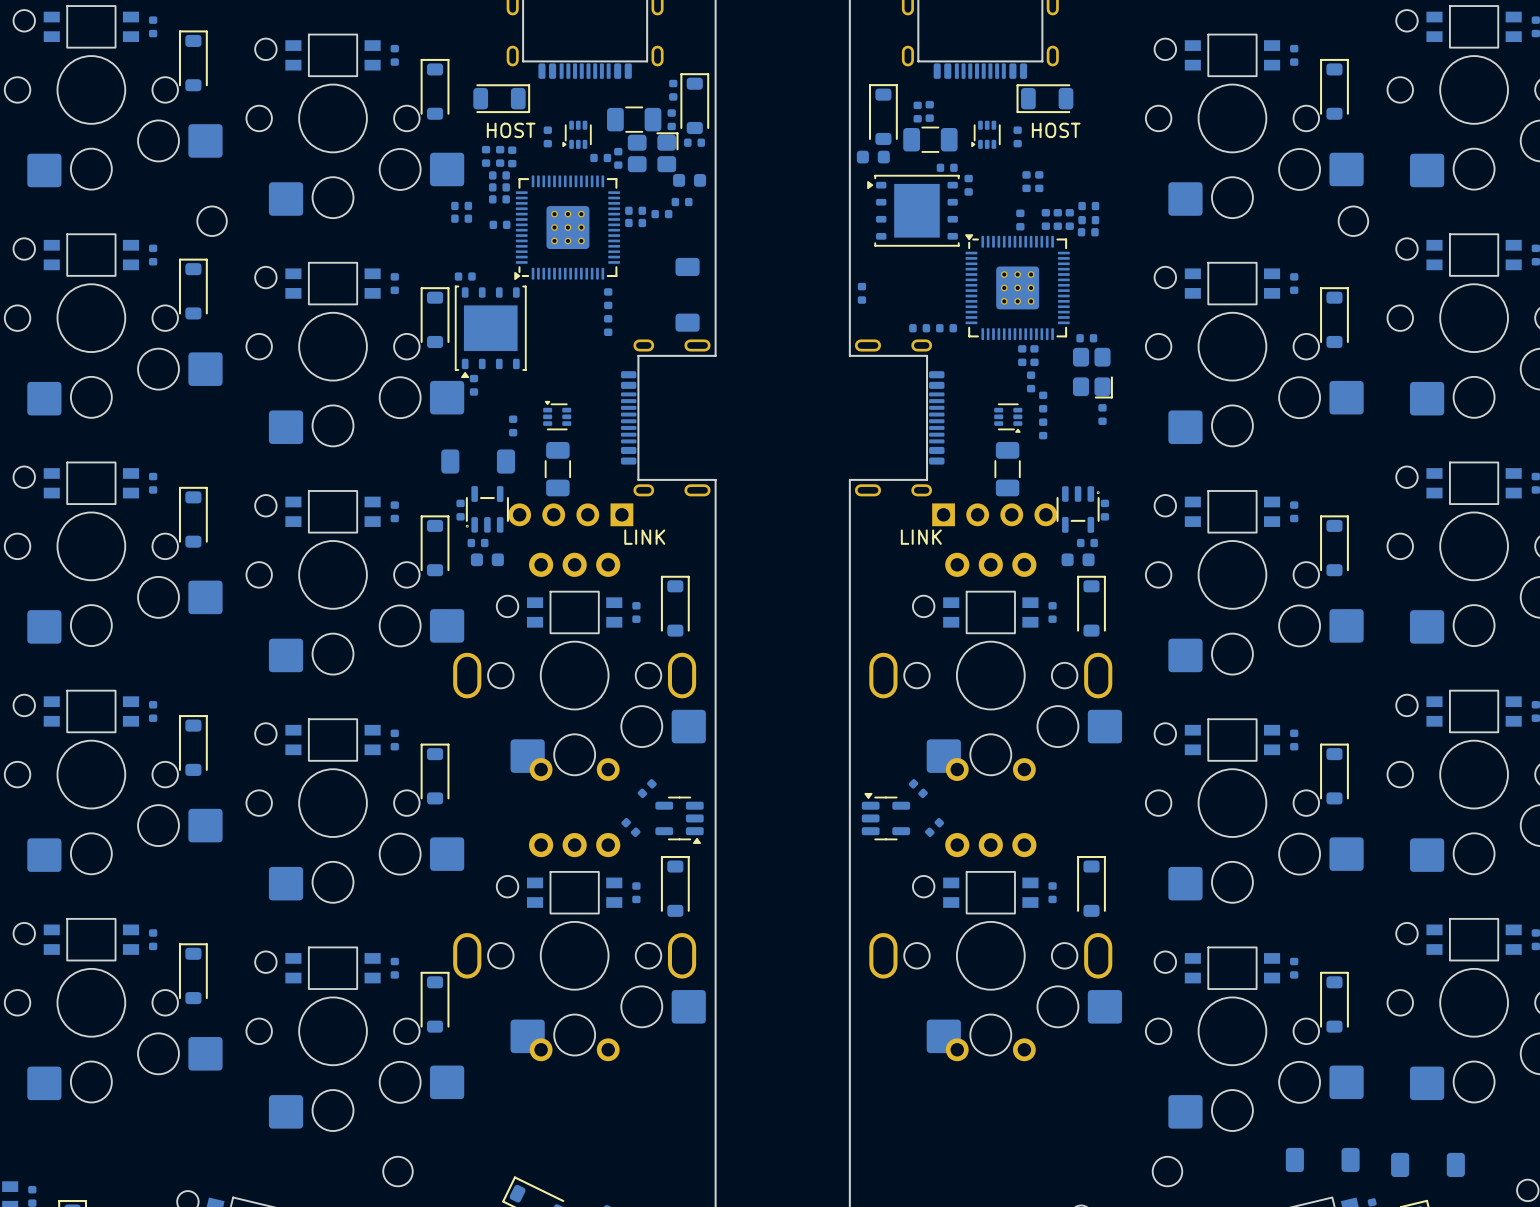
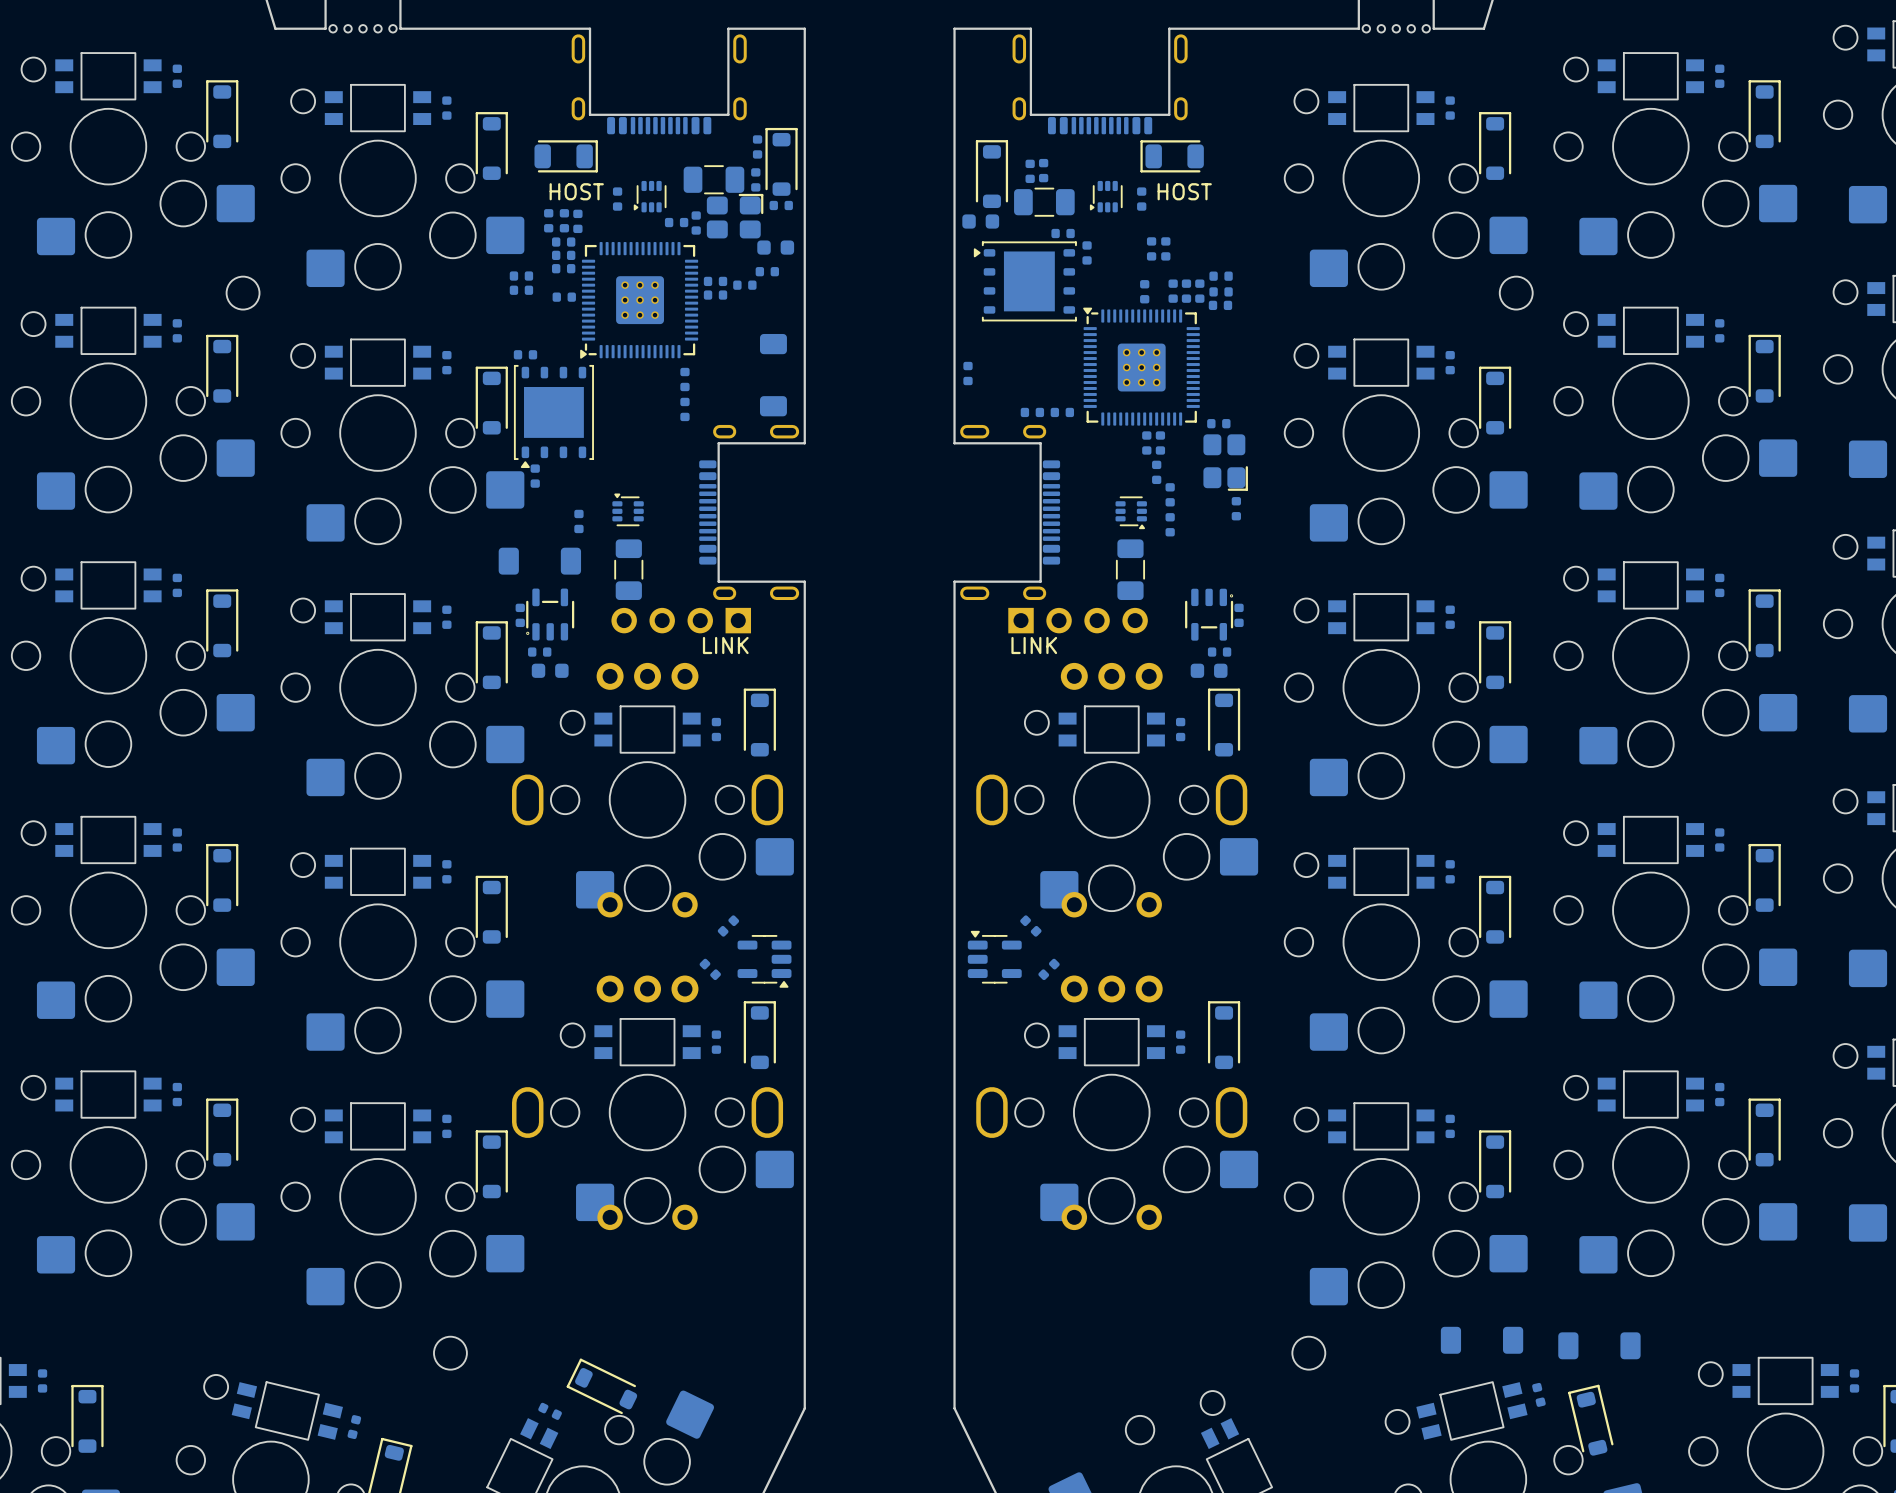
part position: (570, 514) -> (681, 620)
part position: (994, 514) -> (1078, 620)

